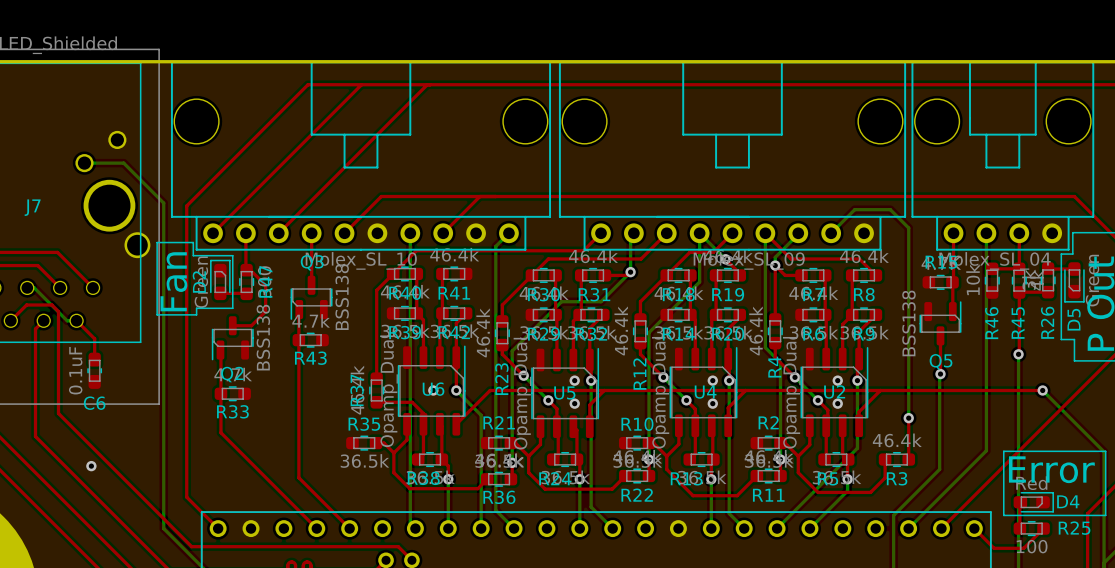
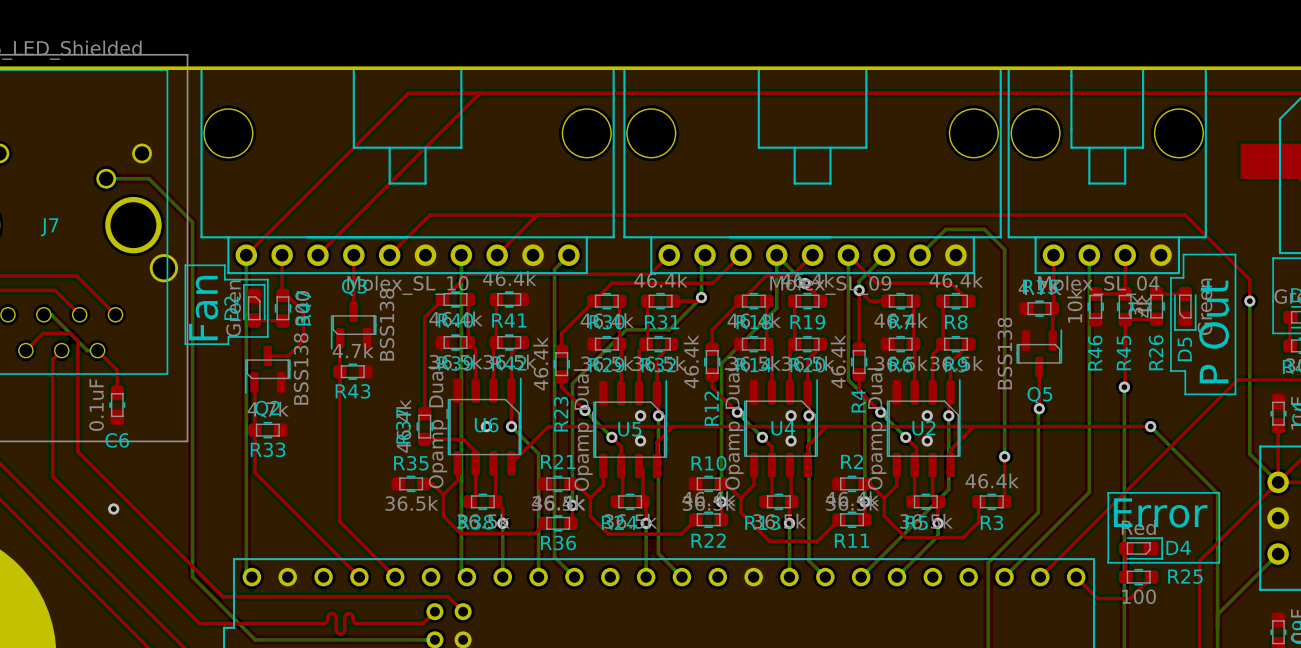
top track: (361, 84) (307, 84) (186, 205) (186, 497) (218, 528) -> none
bottom track: none -> (246, 255) (246, 571) (251, 577)

